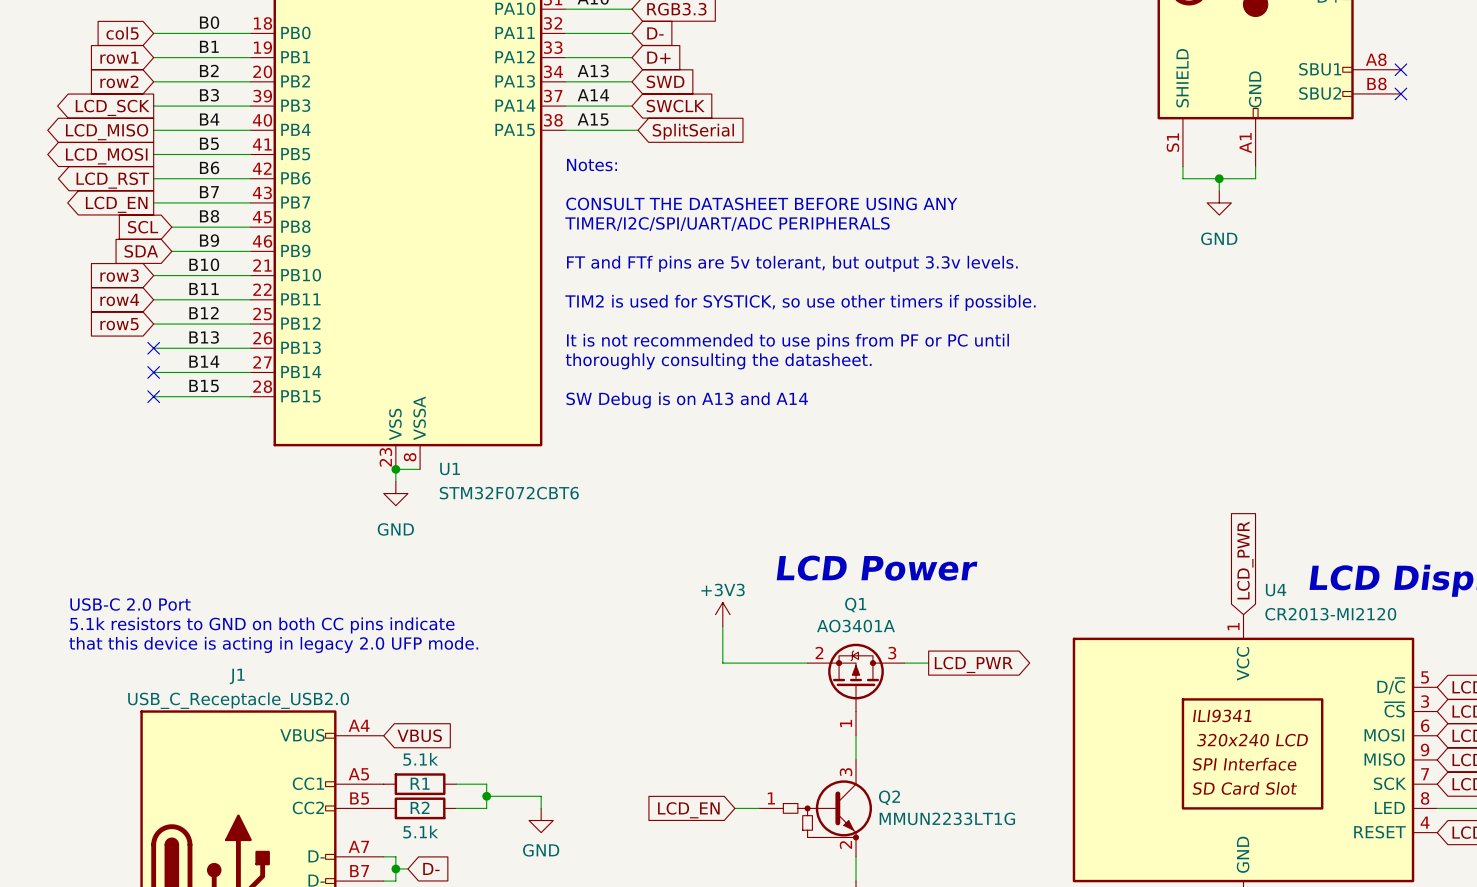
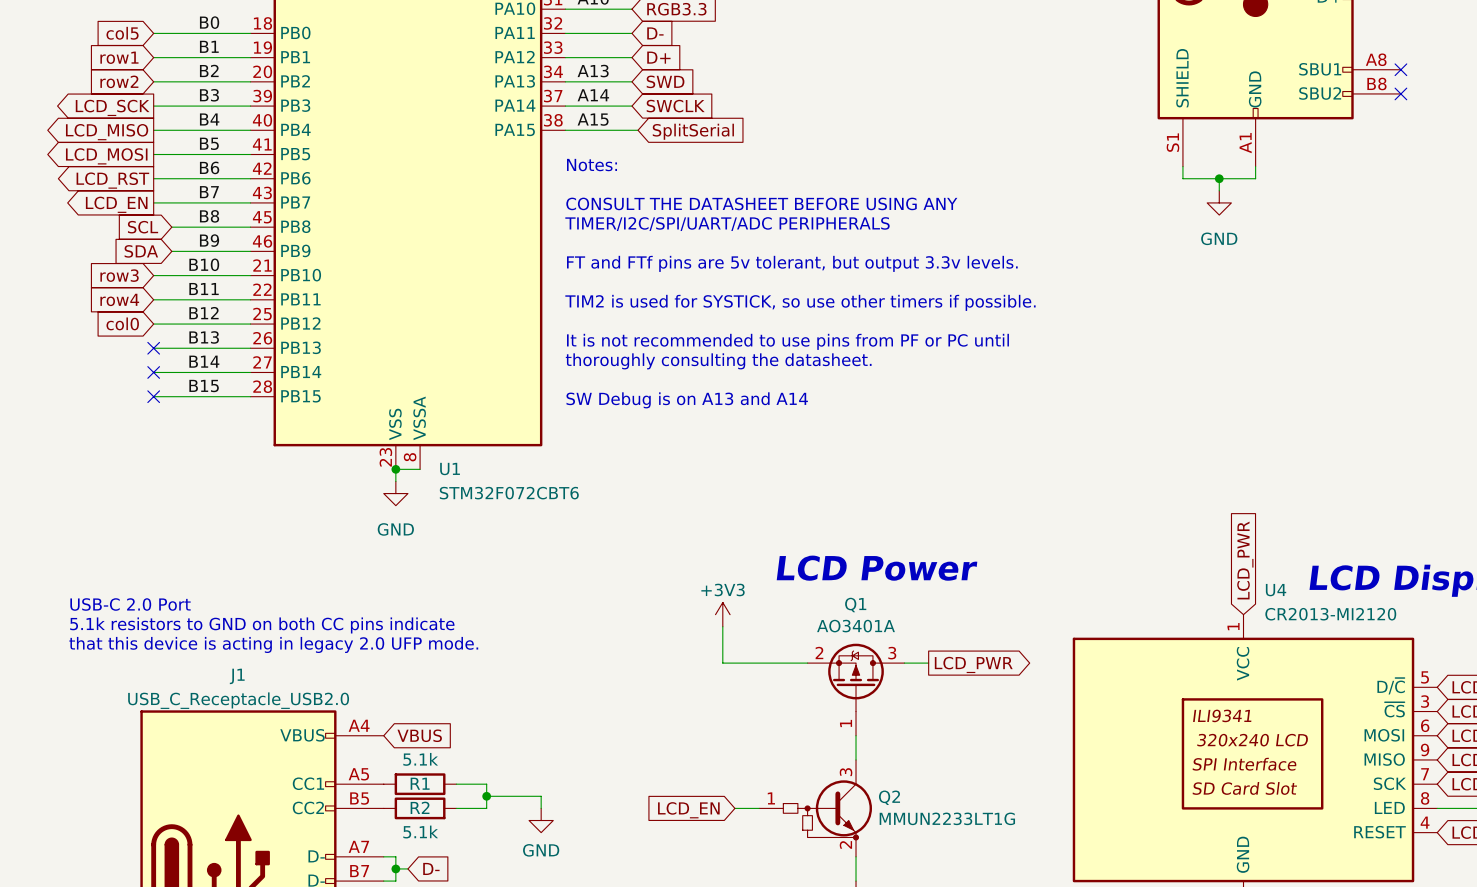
global label: row5 (119, 324) -> col0 (122, 323)

